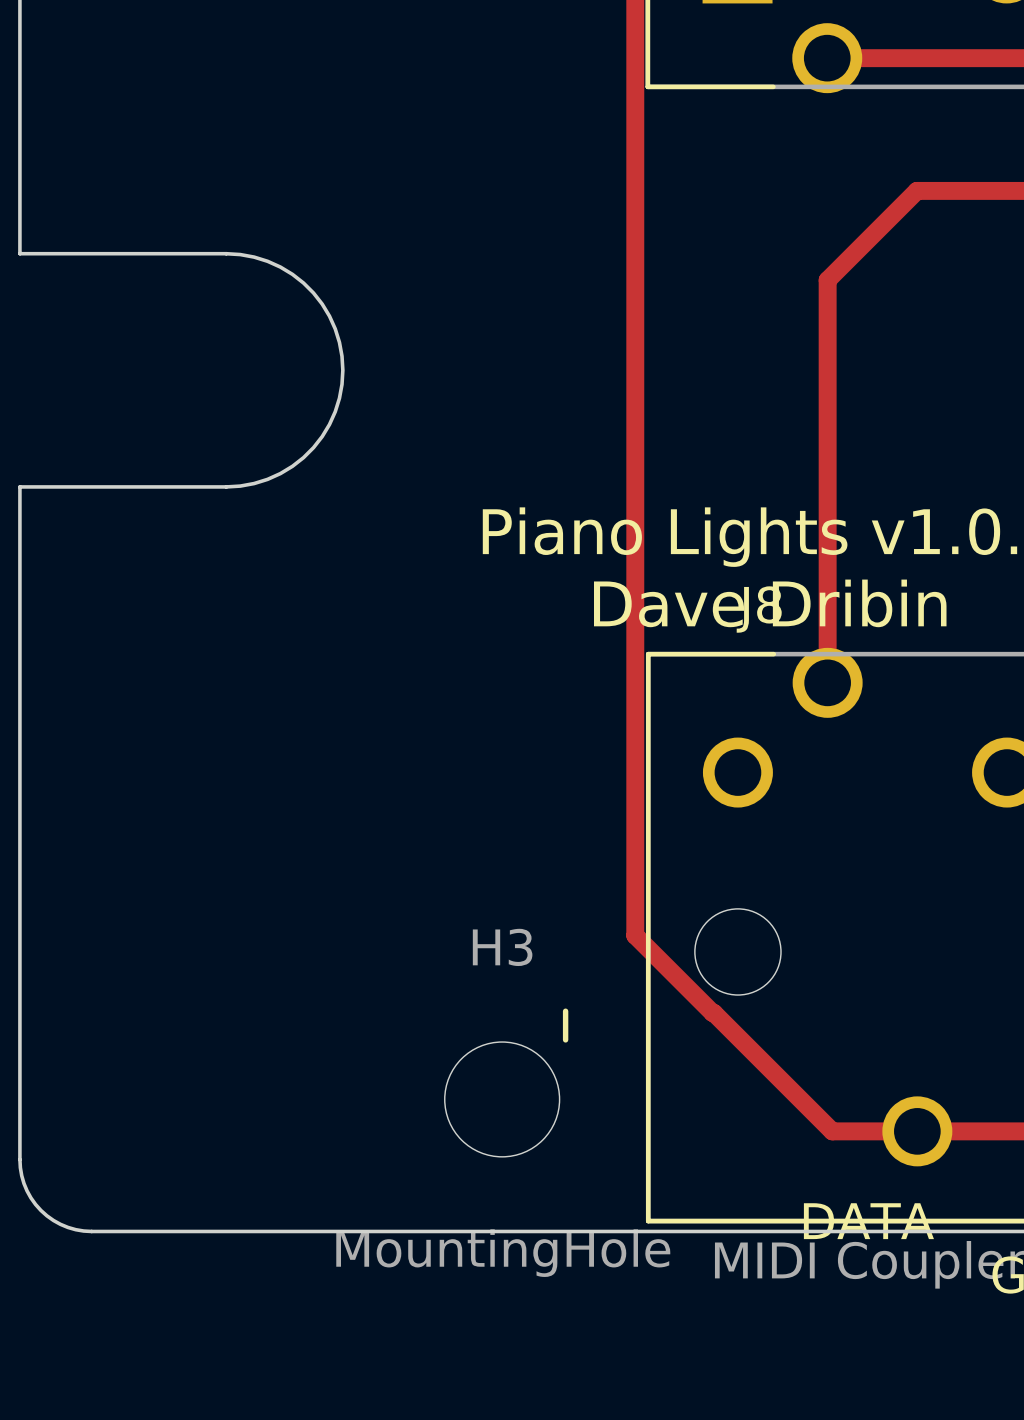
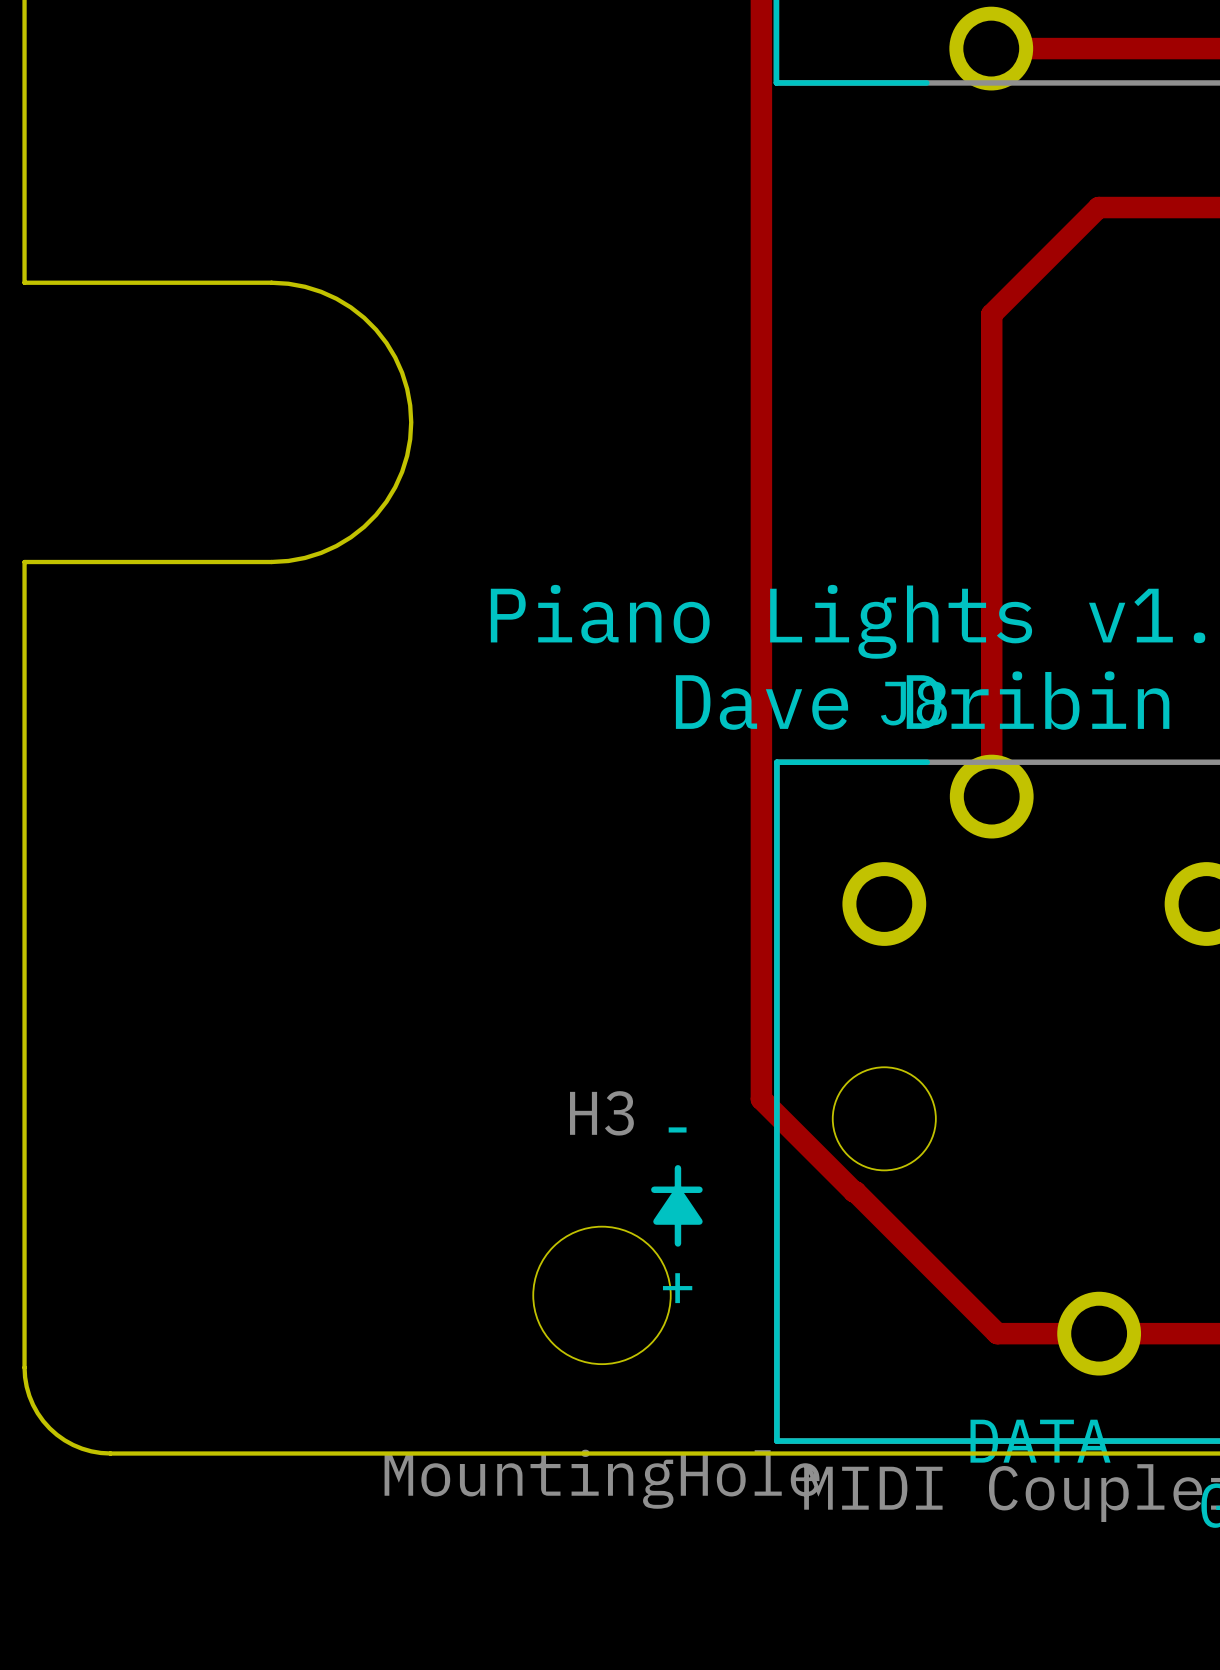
text: none -> - (677, 1129)
line: none -> (677, 1168) (677, 1189)
drawing: none -> [653, 1186, 703, 1225]
line: none -> (654, 1189) (699, 1189)
line: none -> (677, 1224) (677, 1243)
text: none -> + (677, 1288)

